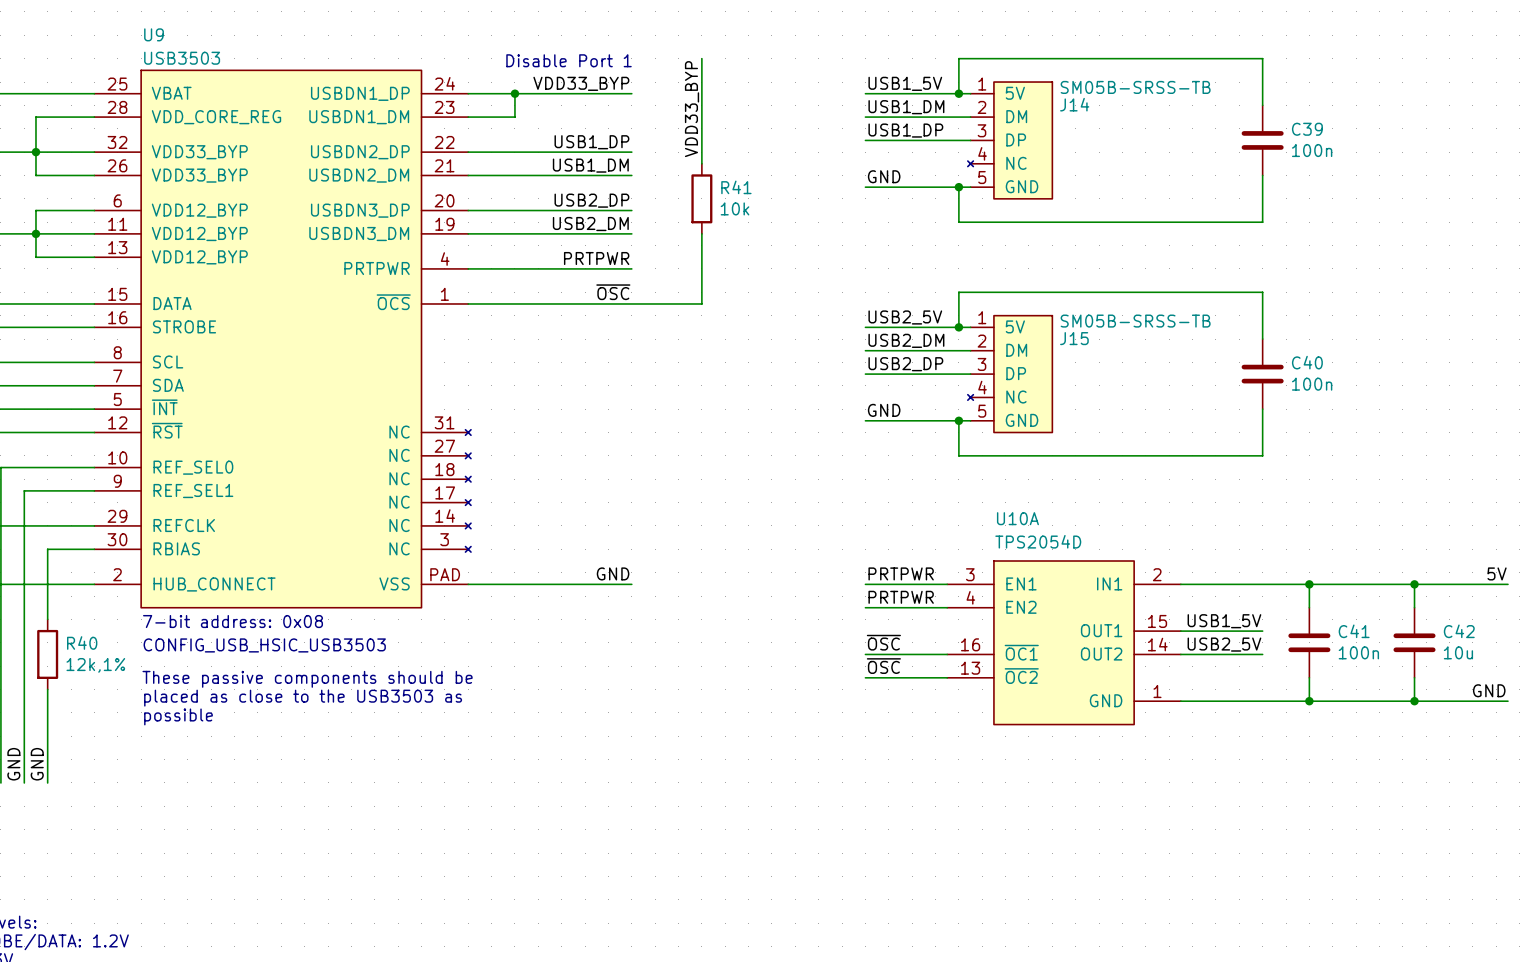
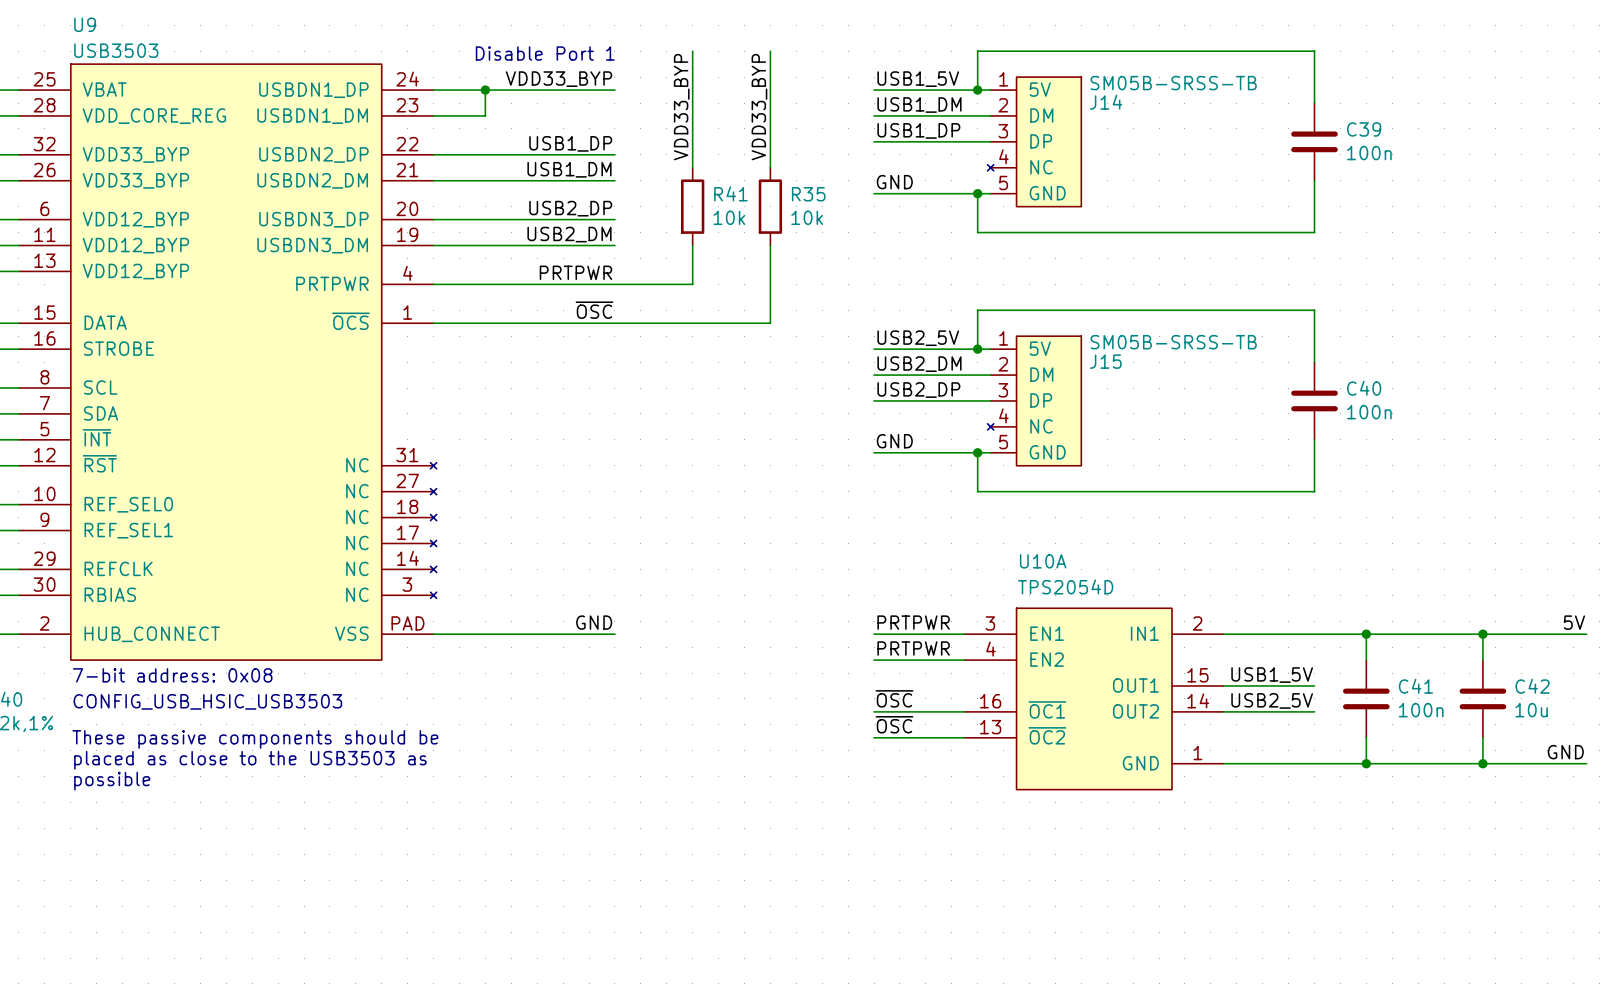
wire: none -> (770, 51) (770, 167)
label: none -> VDD33_BYP (759, 107)
R35: none -> 10k (770, 206)
wire: none -> (614, 284) (692, 284)
wire: (701, 268) (701, 303) -> (770, 245) (770, 323) (692, 323)

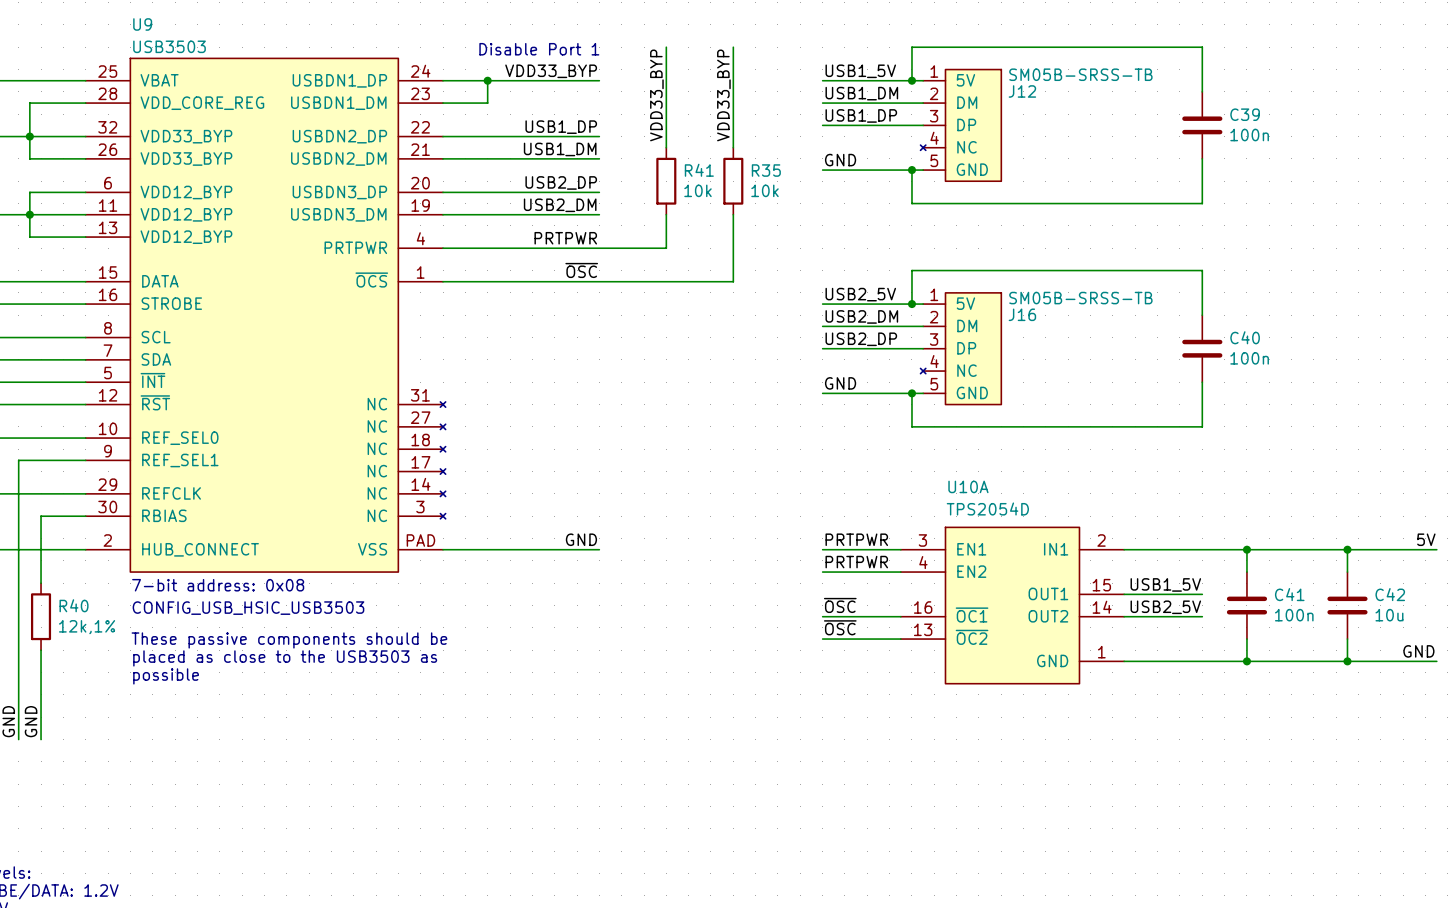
J14 name: J14 (1106, 102) -> J12 (1022, 91)
J15 name: J15 (1105, 361) -> J16 (1022, 314)

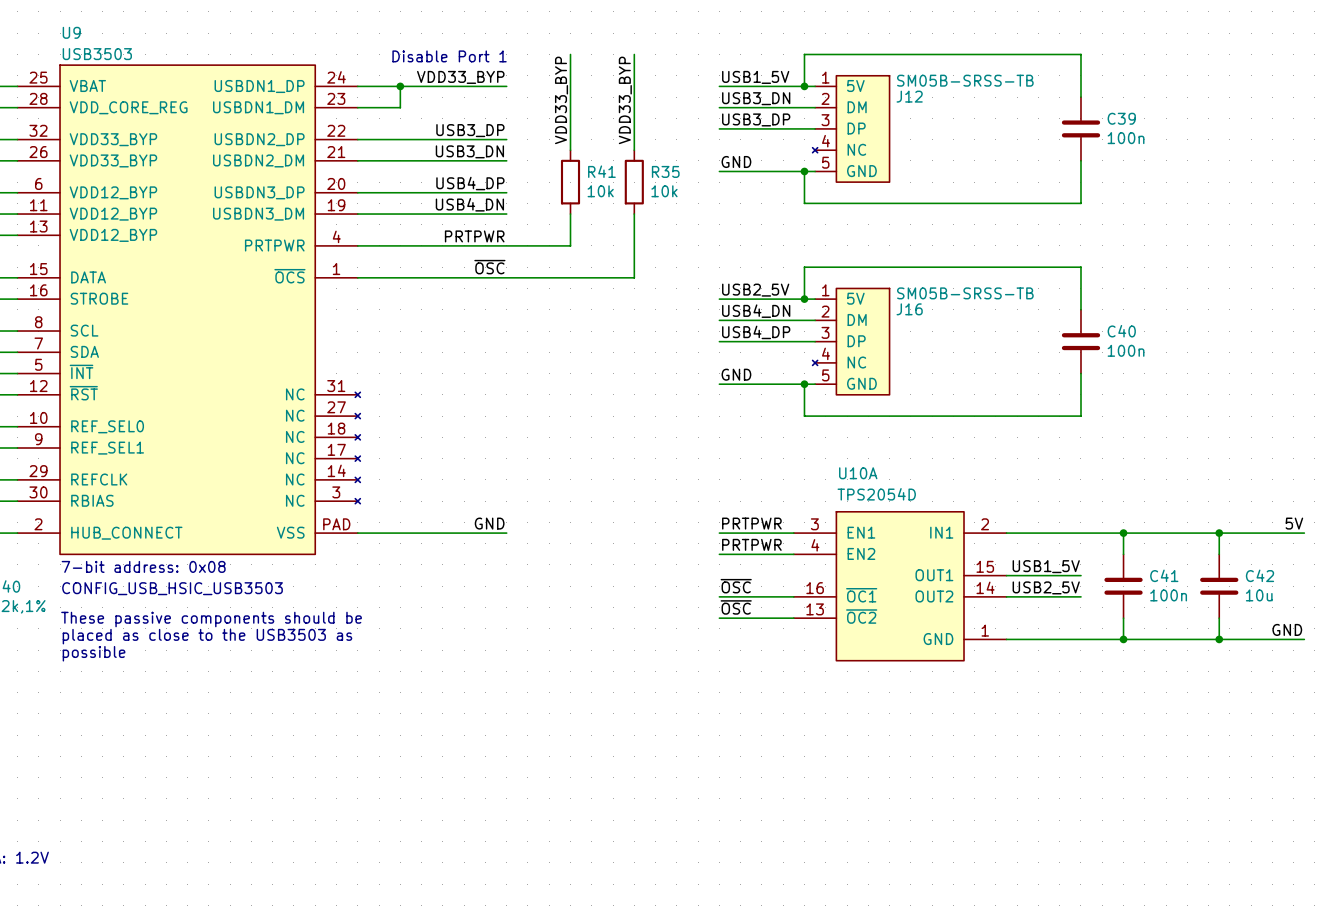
label: USB1_DM (861, 93) -> USB3_DN (756, 98)
label: USB1_DP (861, 115) -> USB3_DP (756, 119)
label: USB1_DP (561, 127) -> USB3_DP (470, 130)
label: USB1_DM (560, 149) -> USB3_DN (469, 151)
label: USB2_DP (561, 182) -> USB4_DP (470, 183)
label: USB2_DM (560, 205) -> USB4_DN (469, 204)
label: USB2_DM (861, 316) -> USB4_DN (756, 311)
label: USB2_DP (861, 339) -> USB4_DP (756, 332)

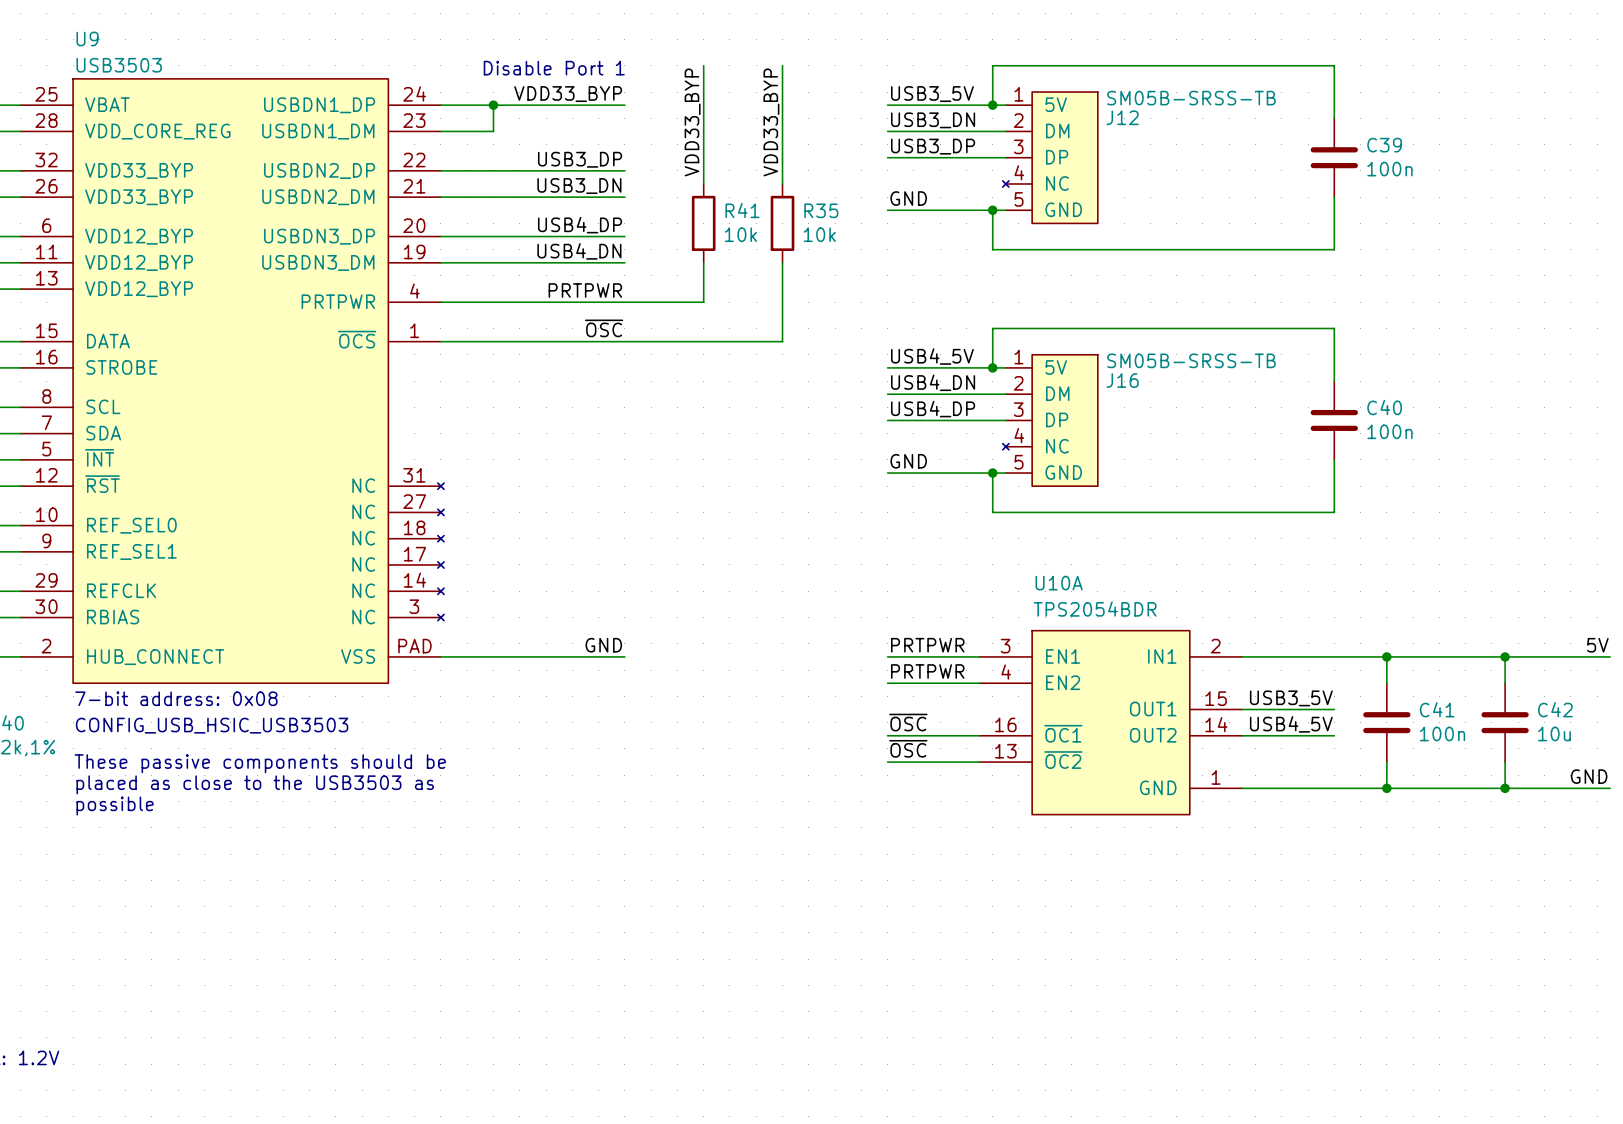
label: USB1_5V (755, 77) -> USB3_5V (932, 94)
label: USB2_5V (755, 290) -> USB4_5V (932, 356)
U10A value: TPS2054D (876, 494) -> TPS2054BDR (1095, 609)
label: USB1_5V (1046, 566) -> USB3_5V (1291, 698)
label: USB2_5V (1046, 587) -> USB4_5V (1291, 724)

